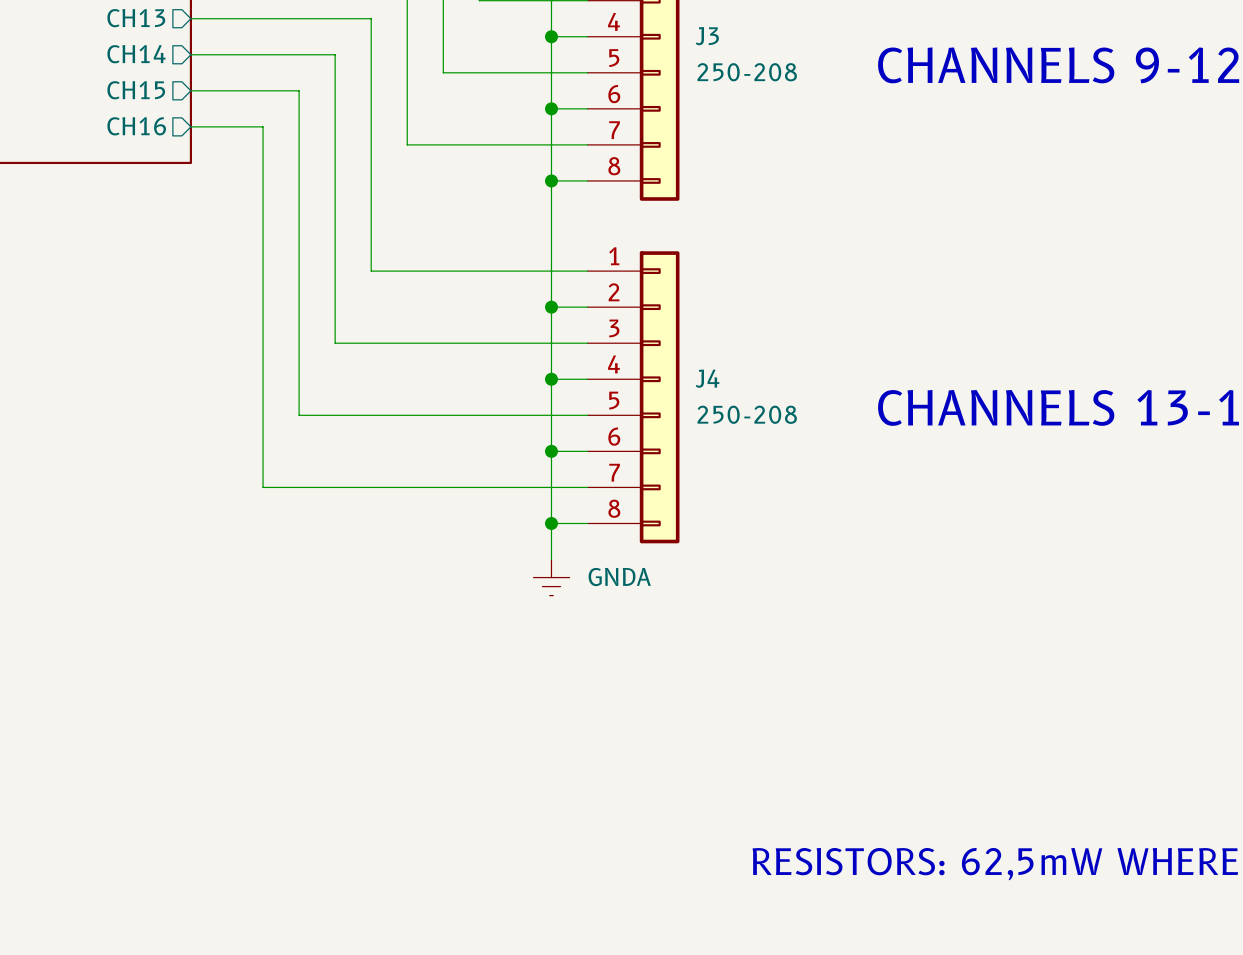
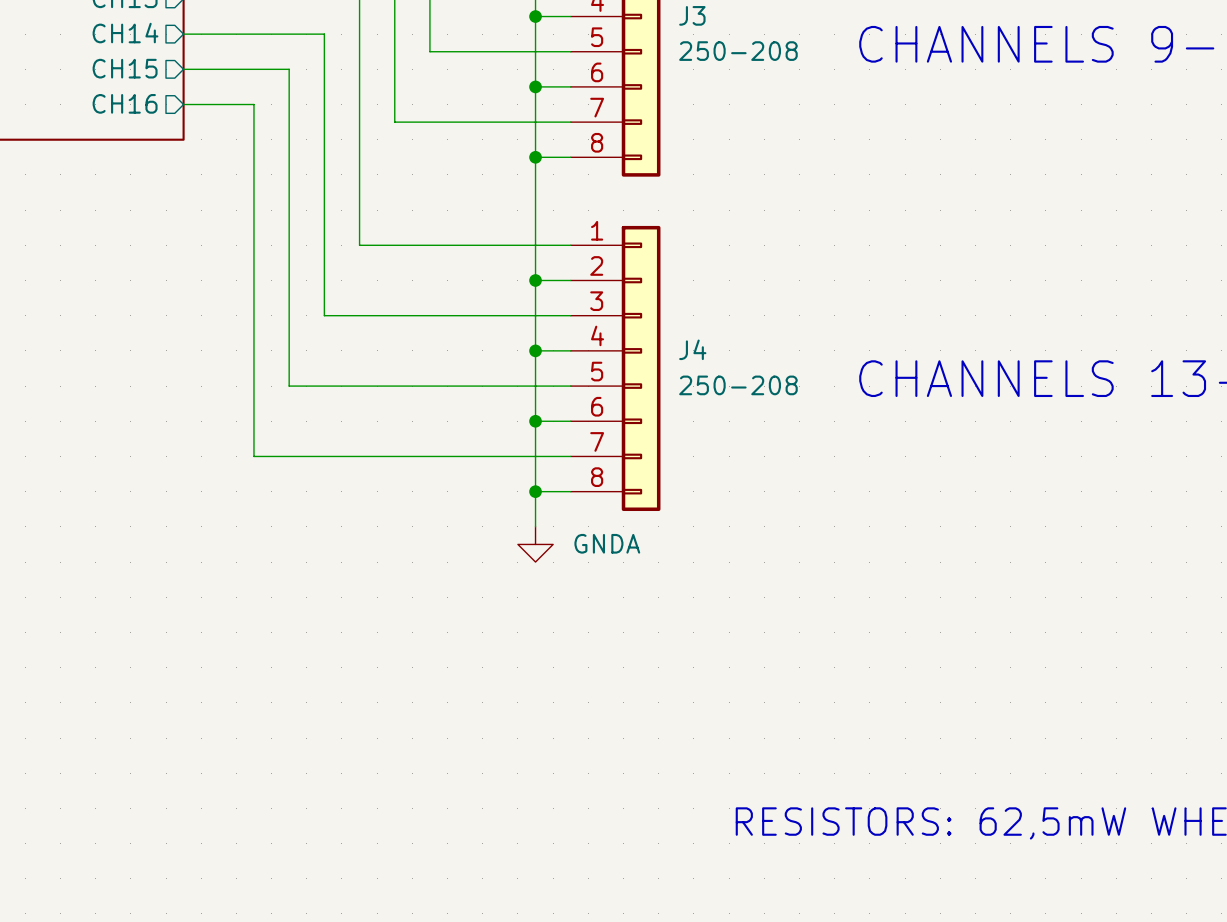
power symbol shape: [533, 559, 570, 596] -> [517, 526, 554, 563]

